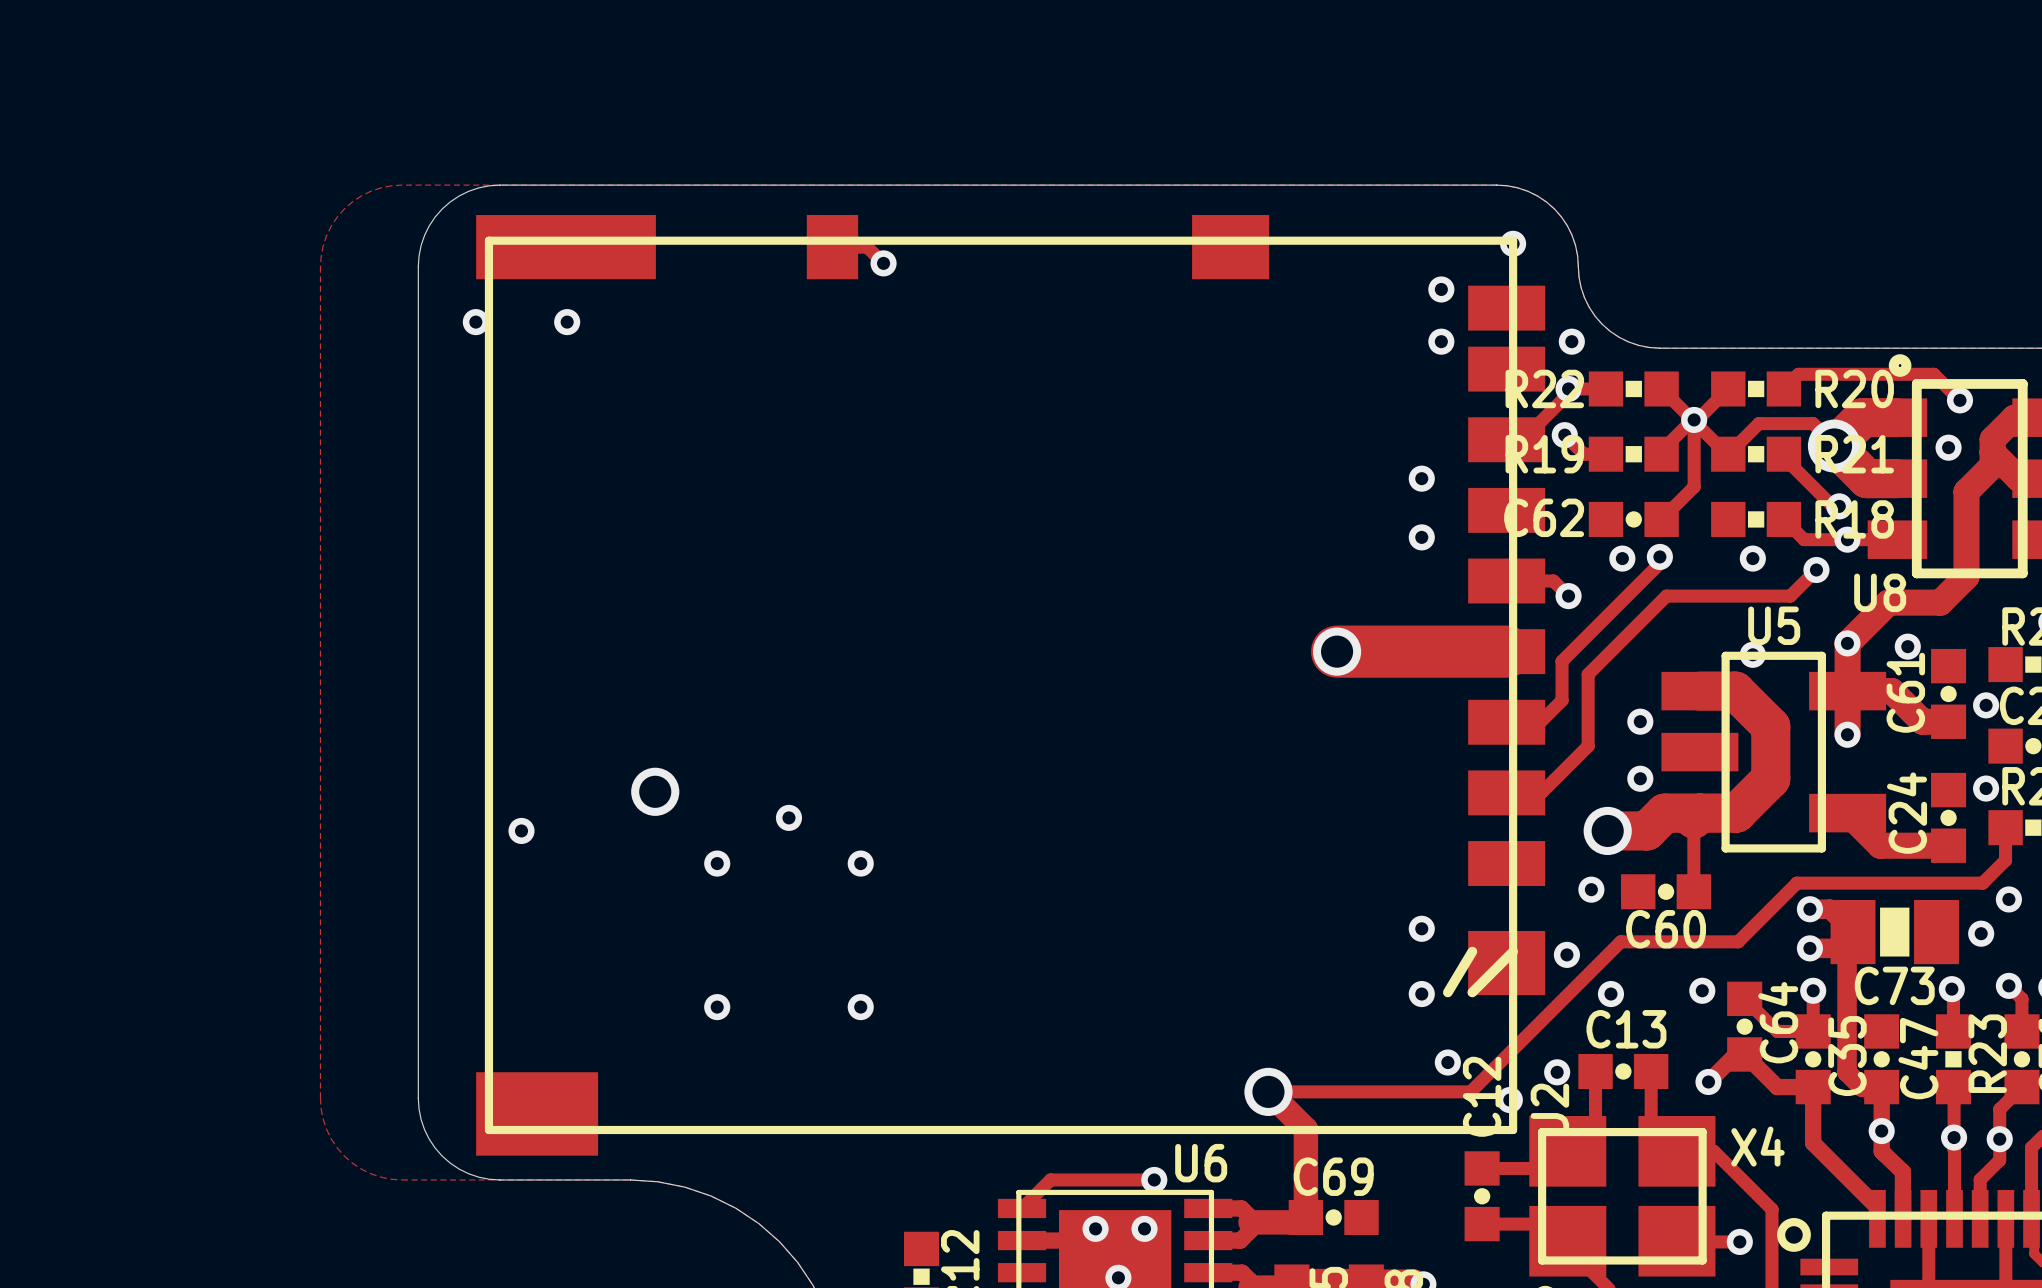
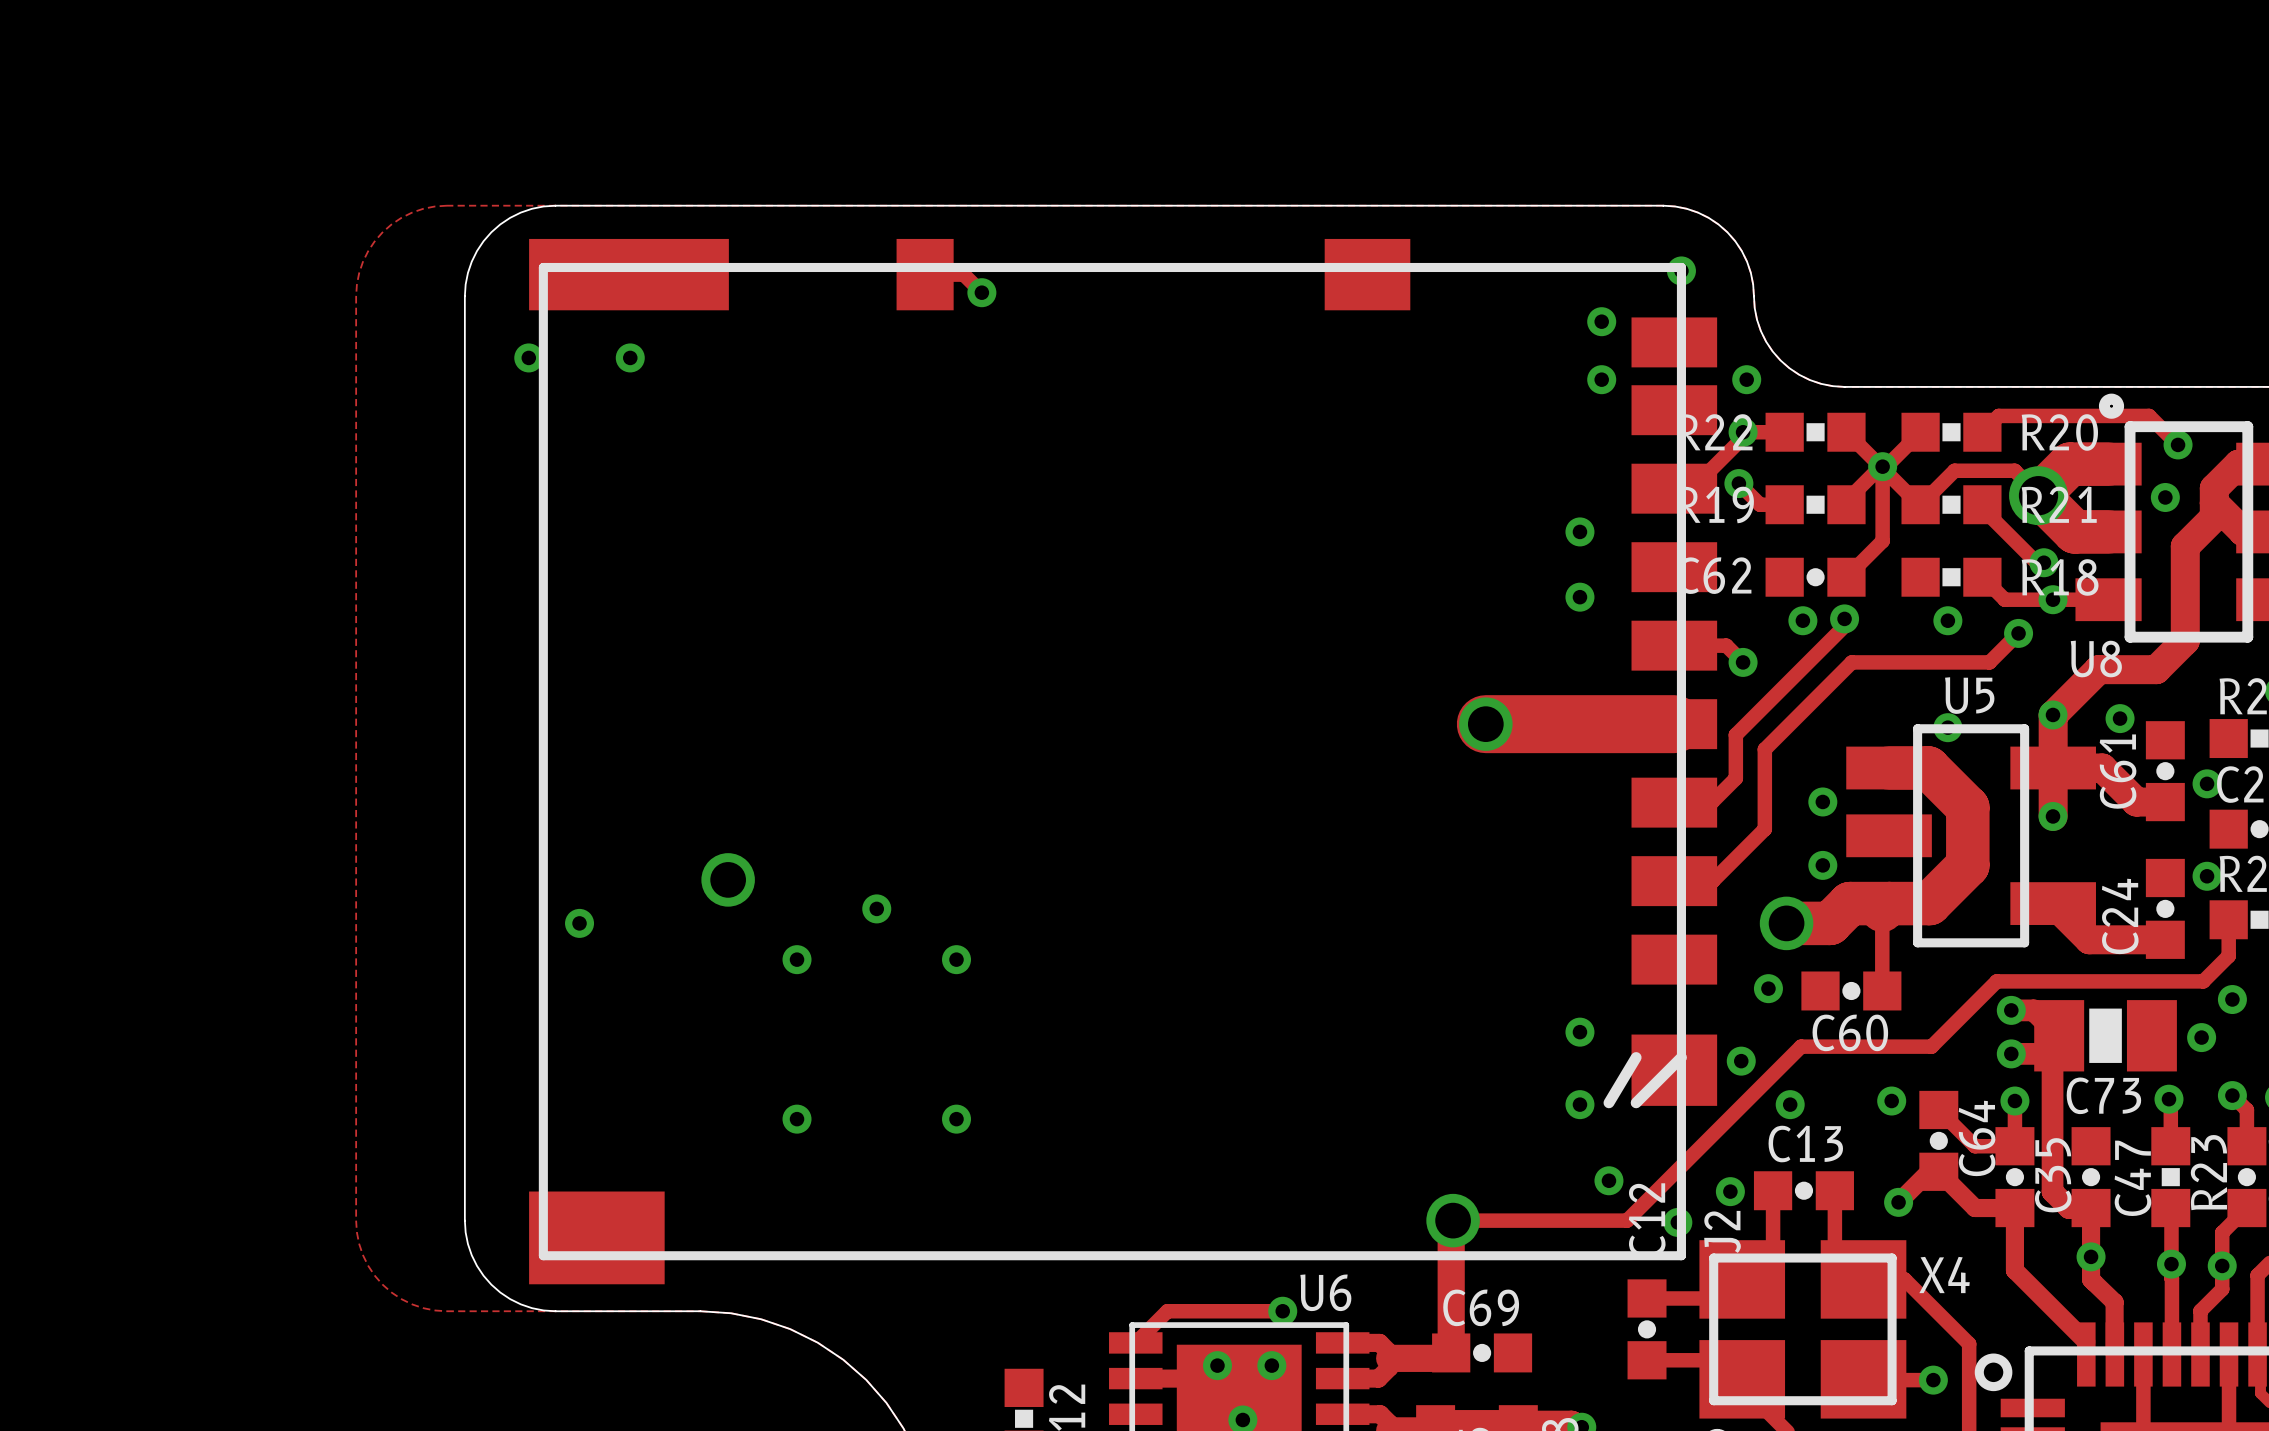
via position: (1268, 1091) -> (1453, 1220)
track: (1470, 1091) (1268, 1091) (1305, 1129) -> (1634, 1213) (1627, 1220) (1453, 1220) (1451, 1222) (1451, 1254)

